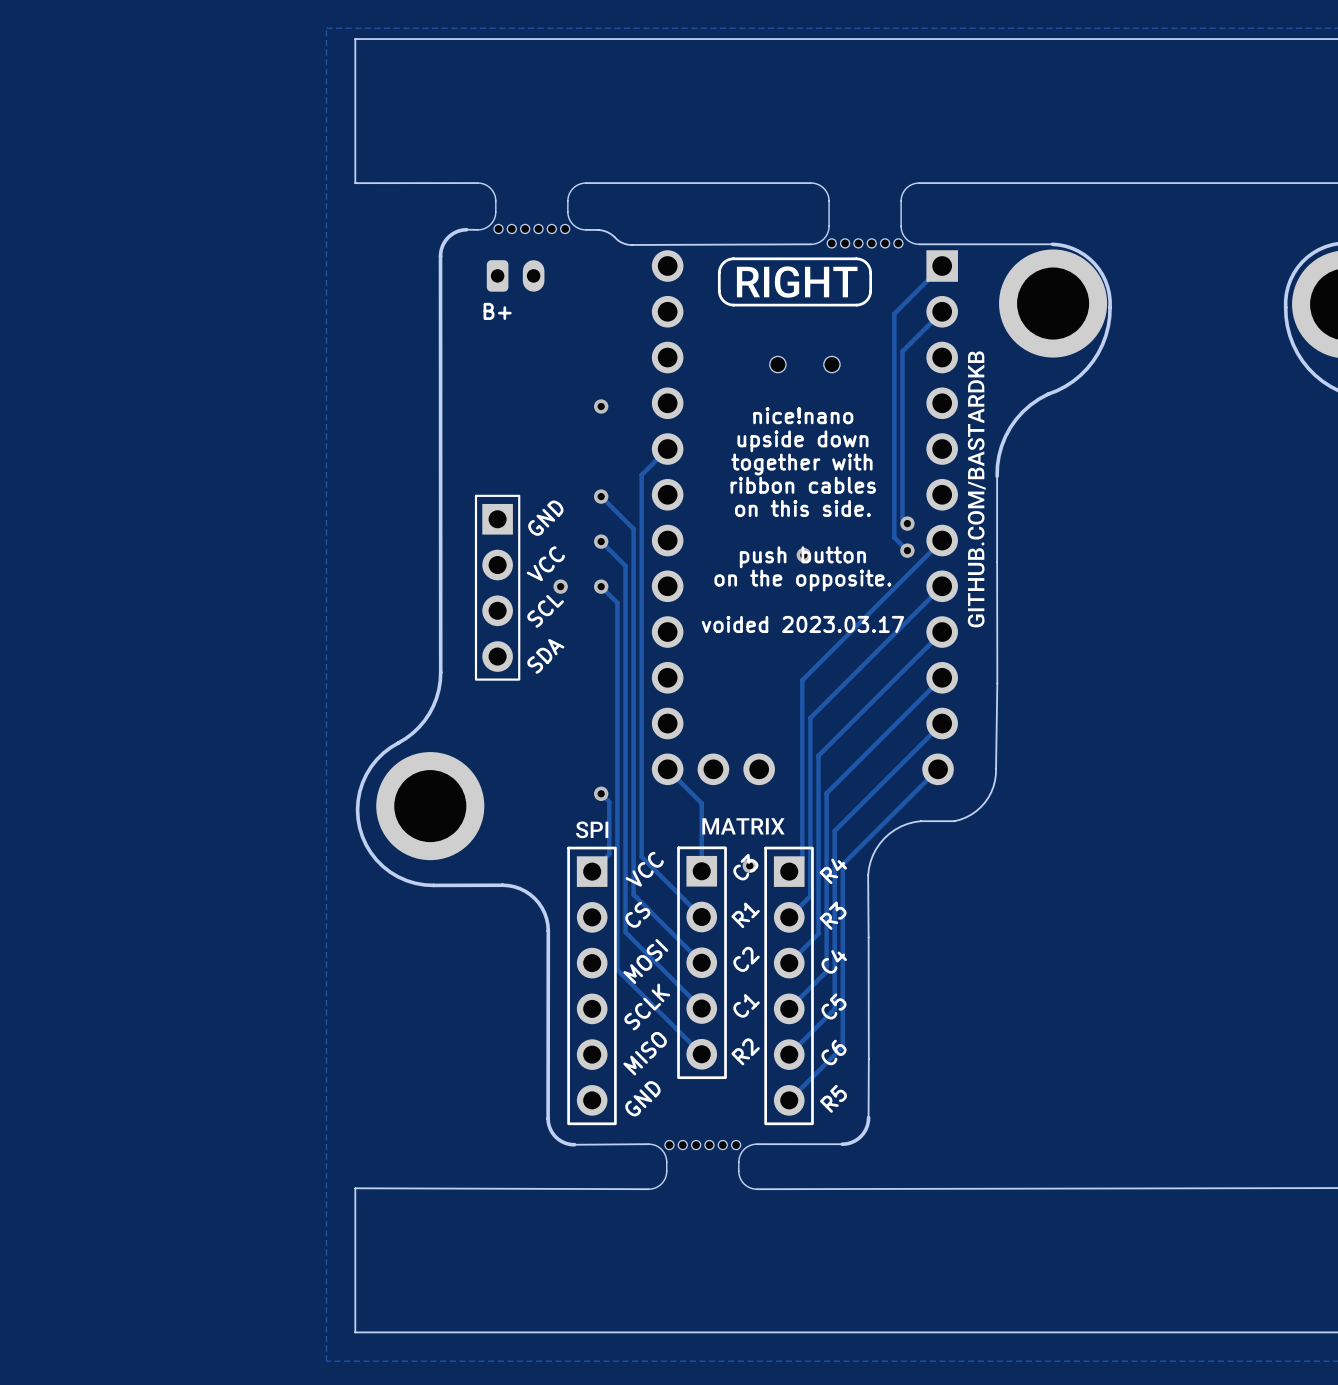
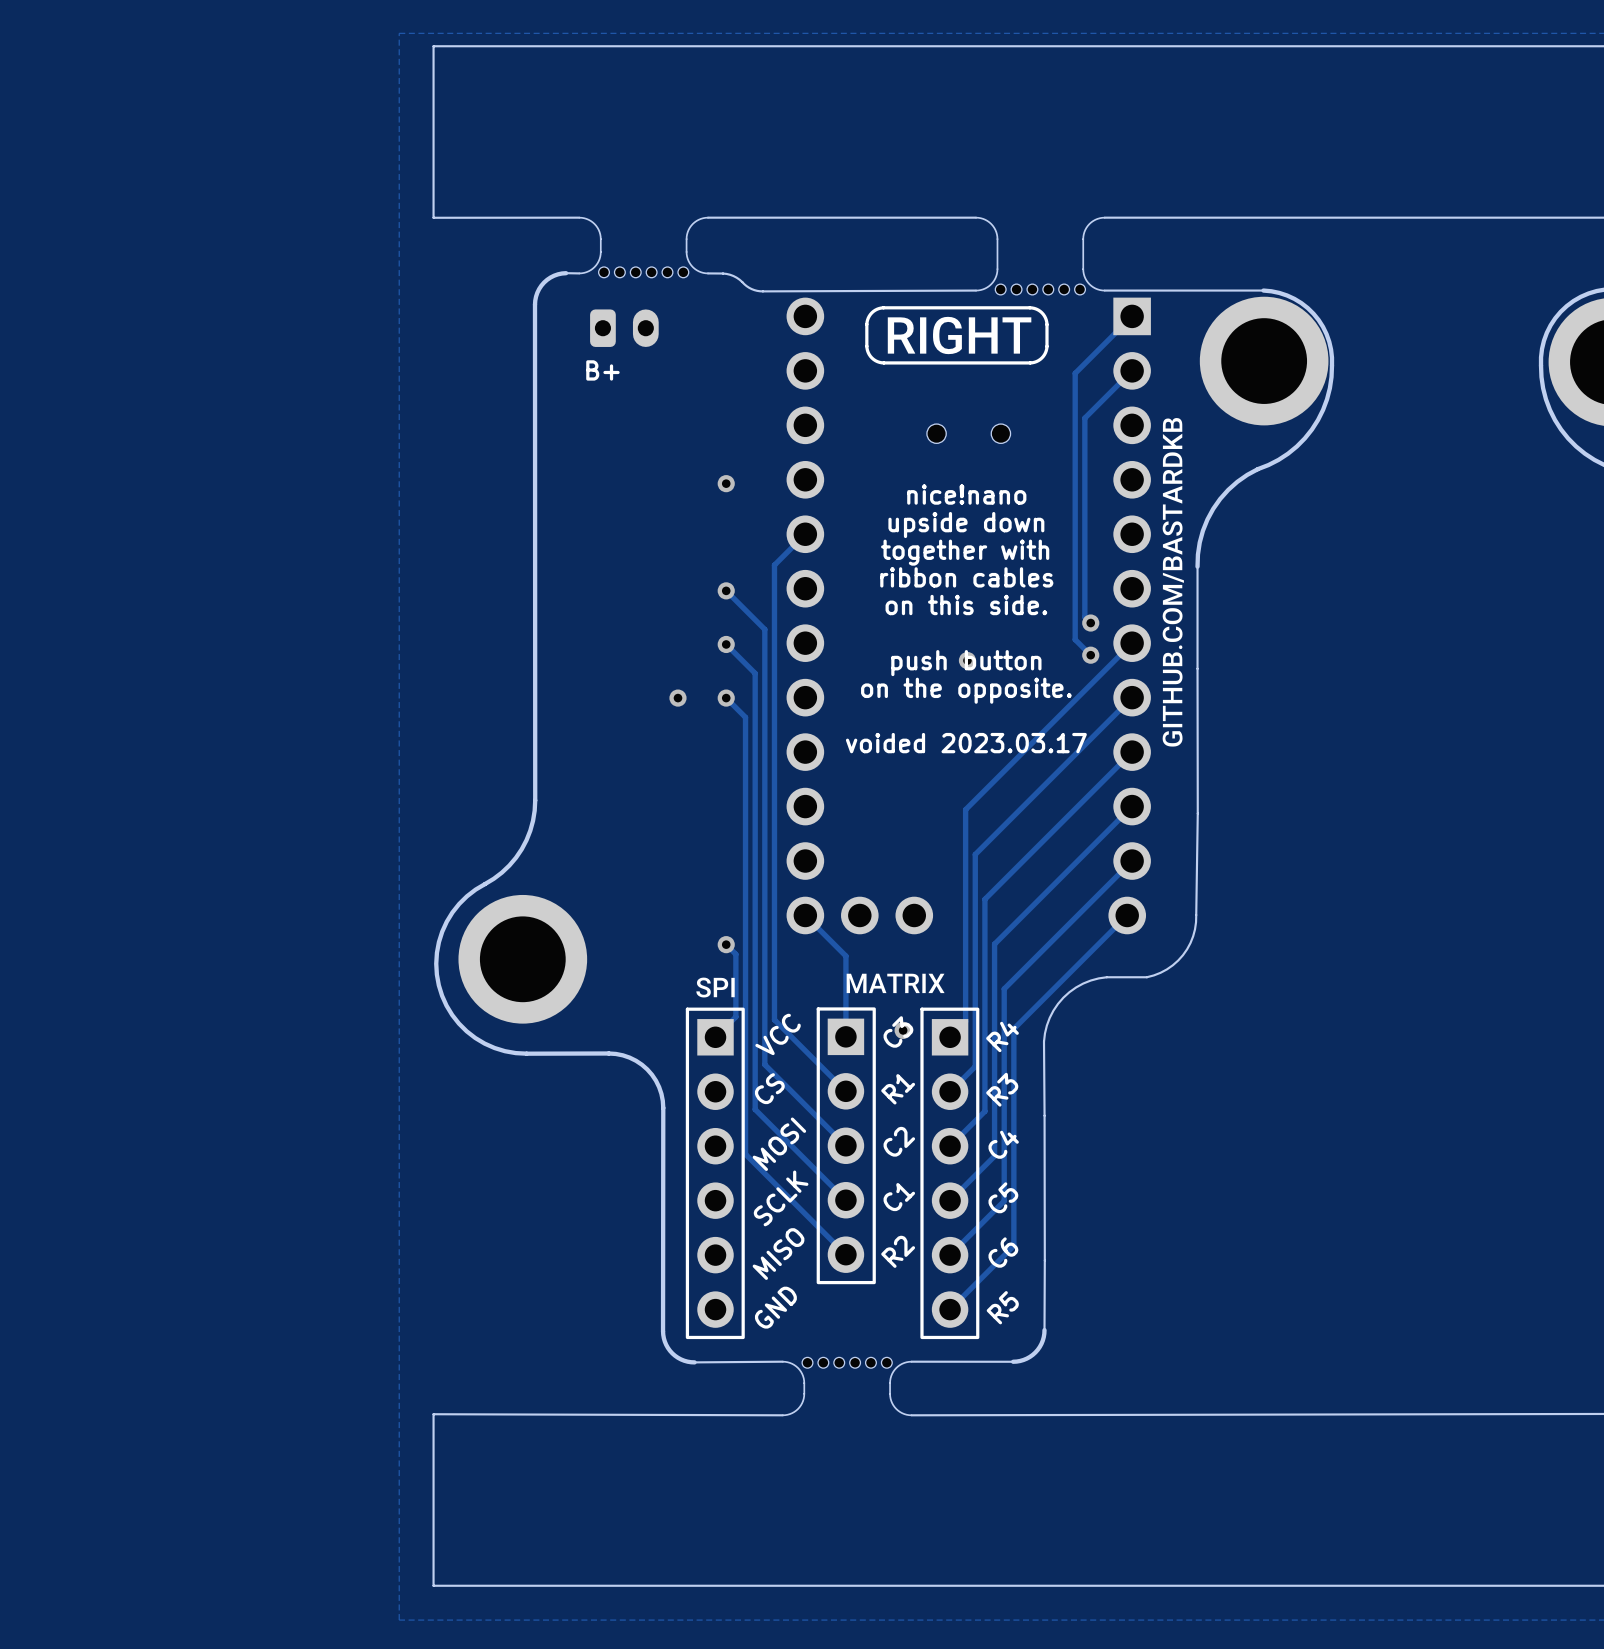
text: GND (545, 518) -> none
text: VCC (545, 563) -> none
part: (497, 587) -> none
text: SCL (545, 611) -> none
text: SDA (545, 656) -> none

